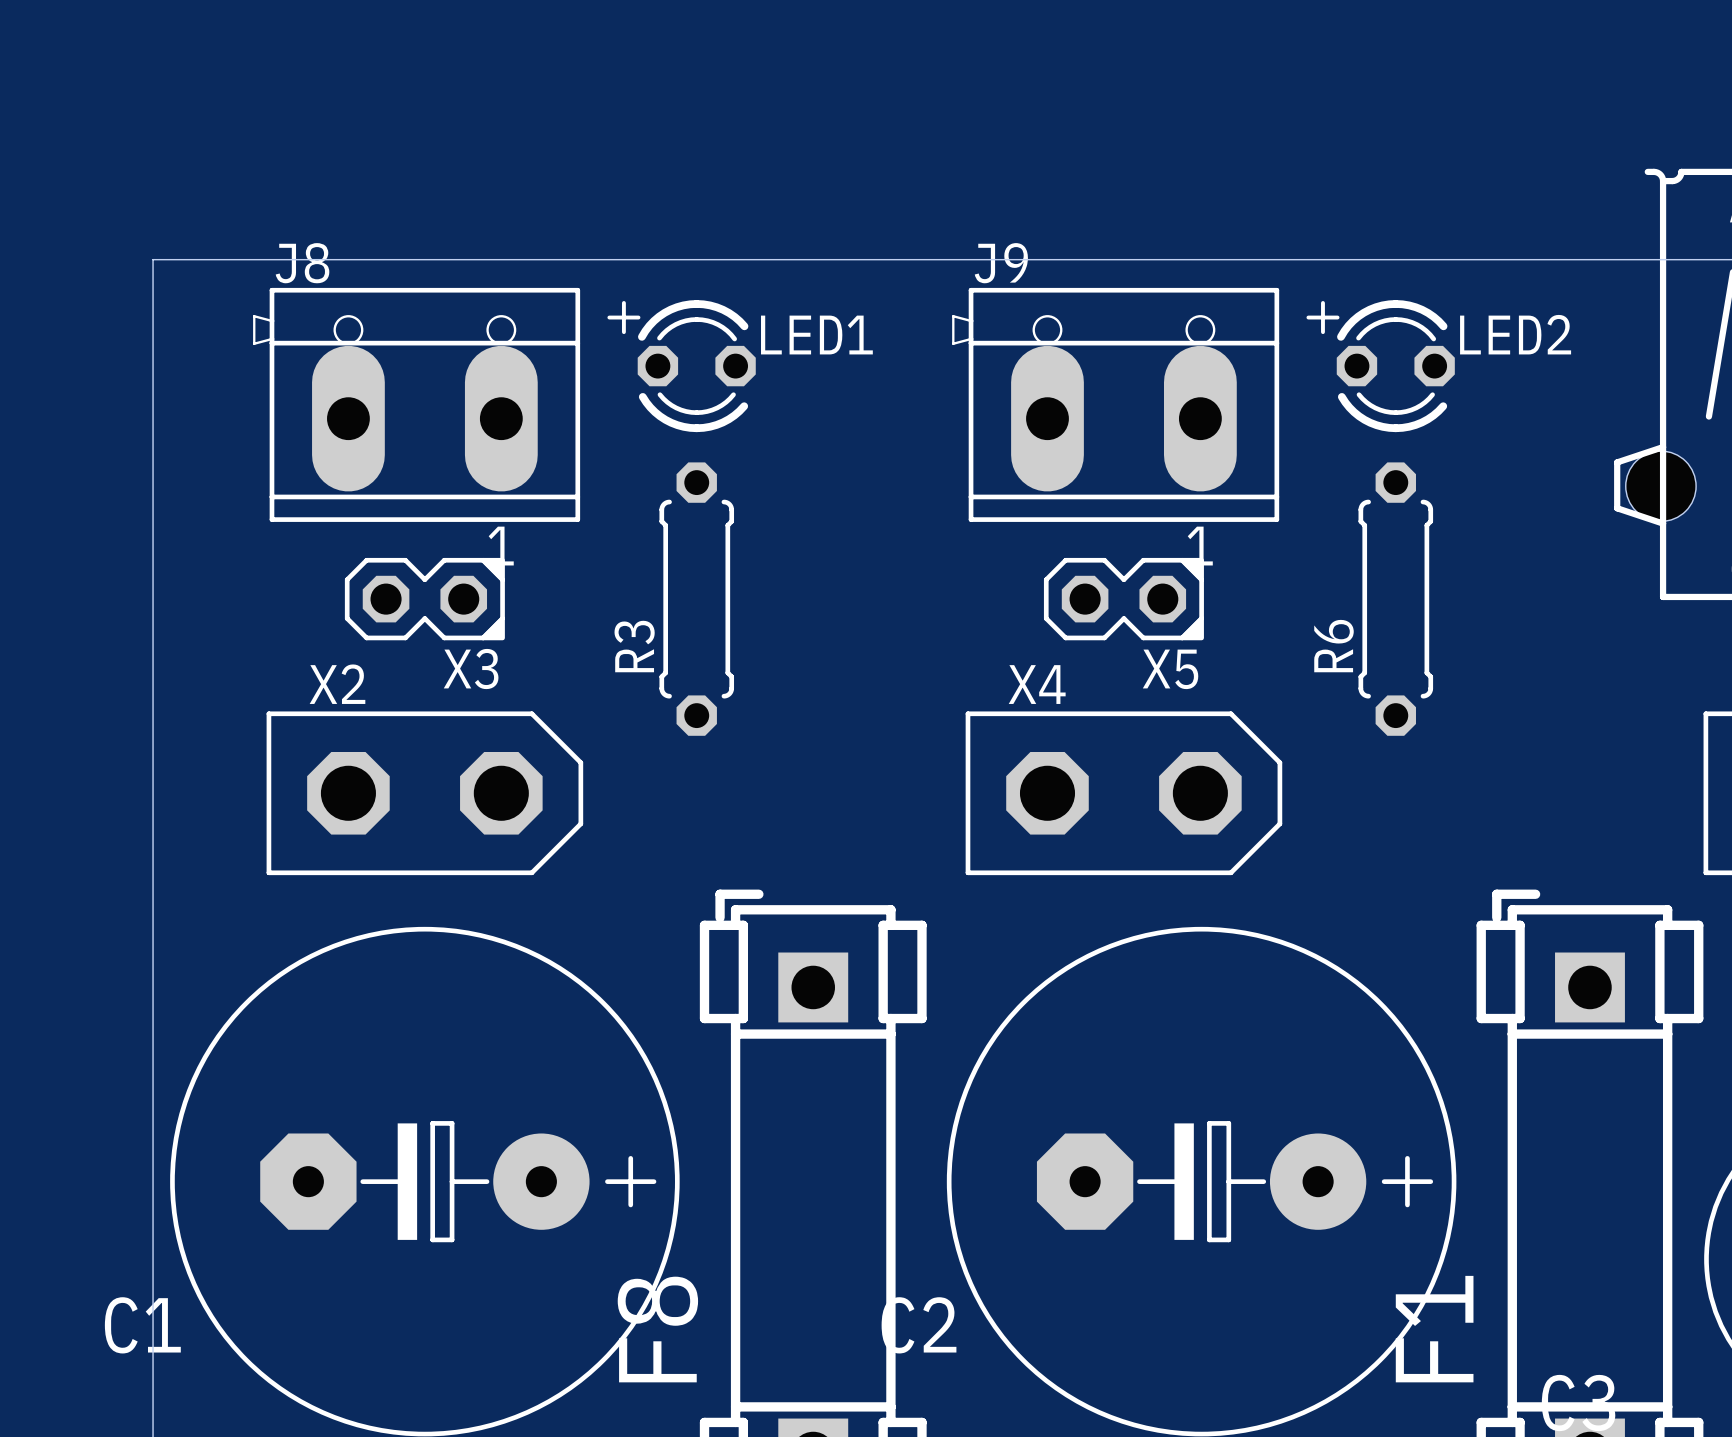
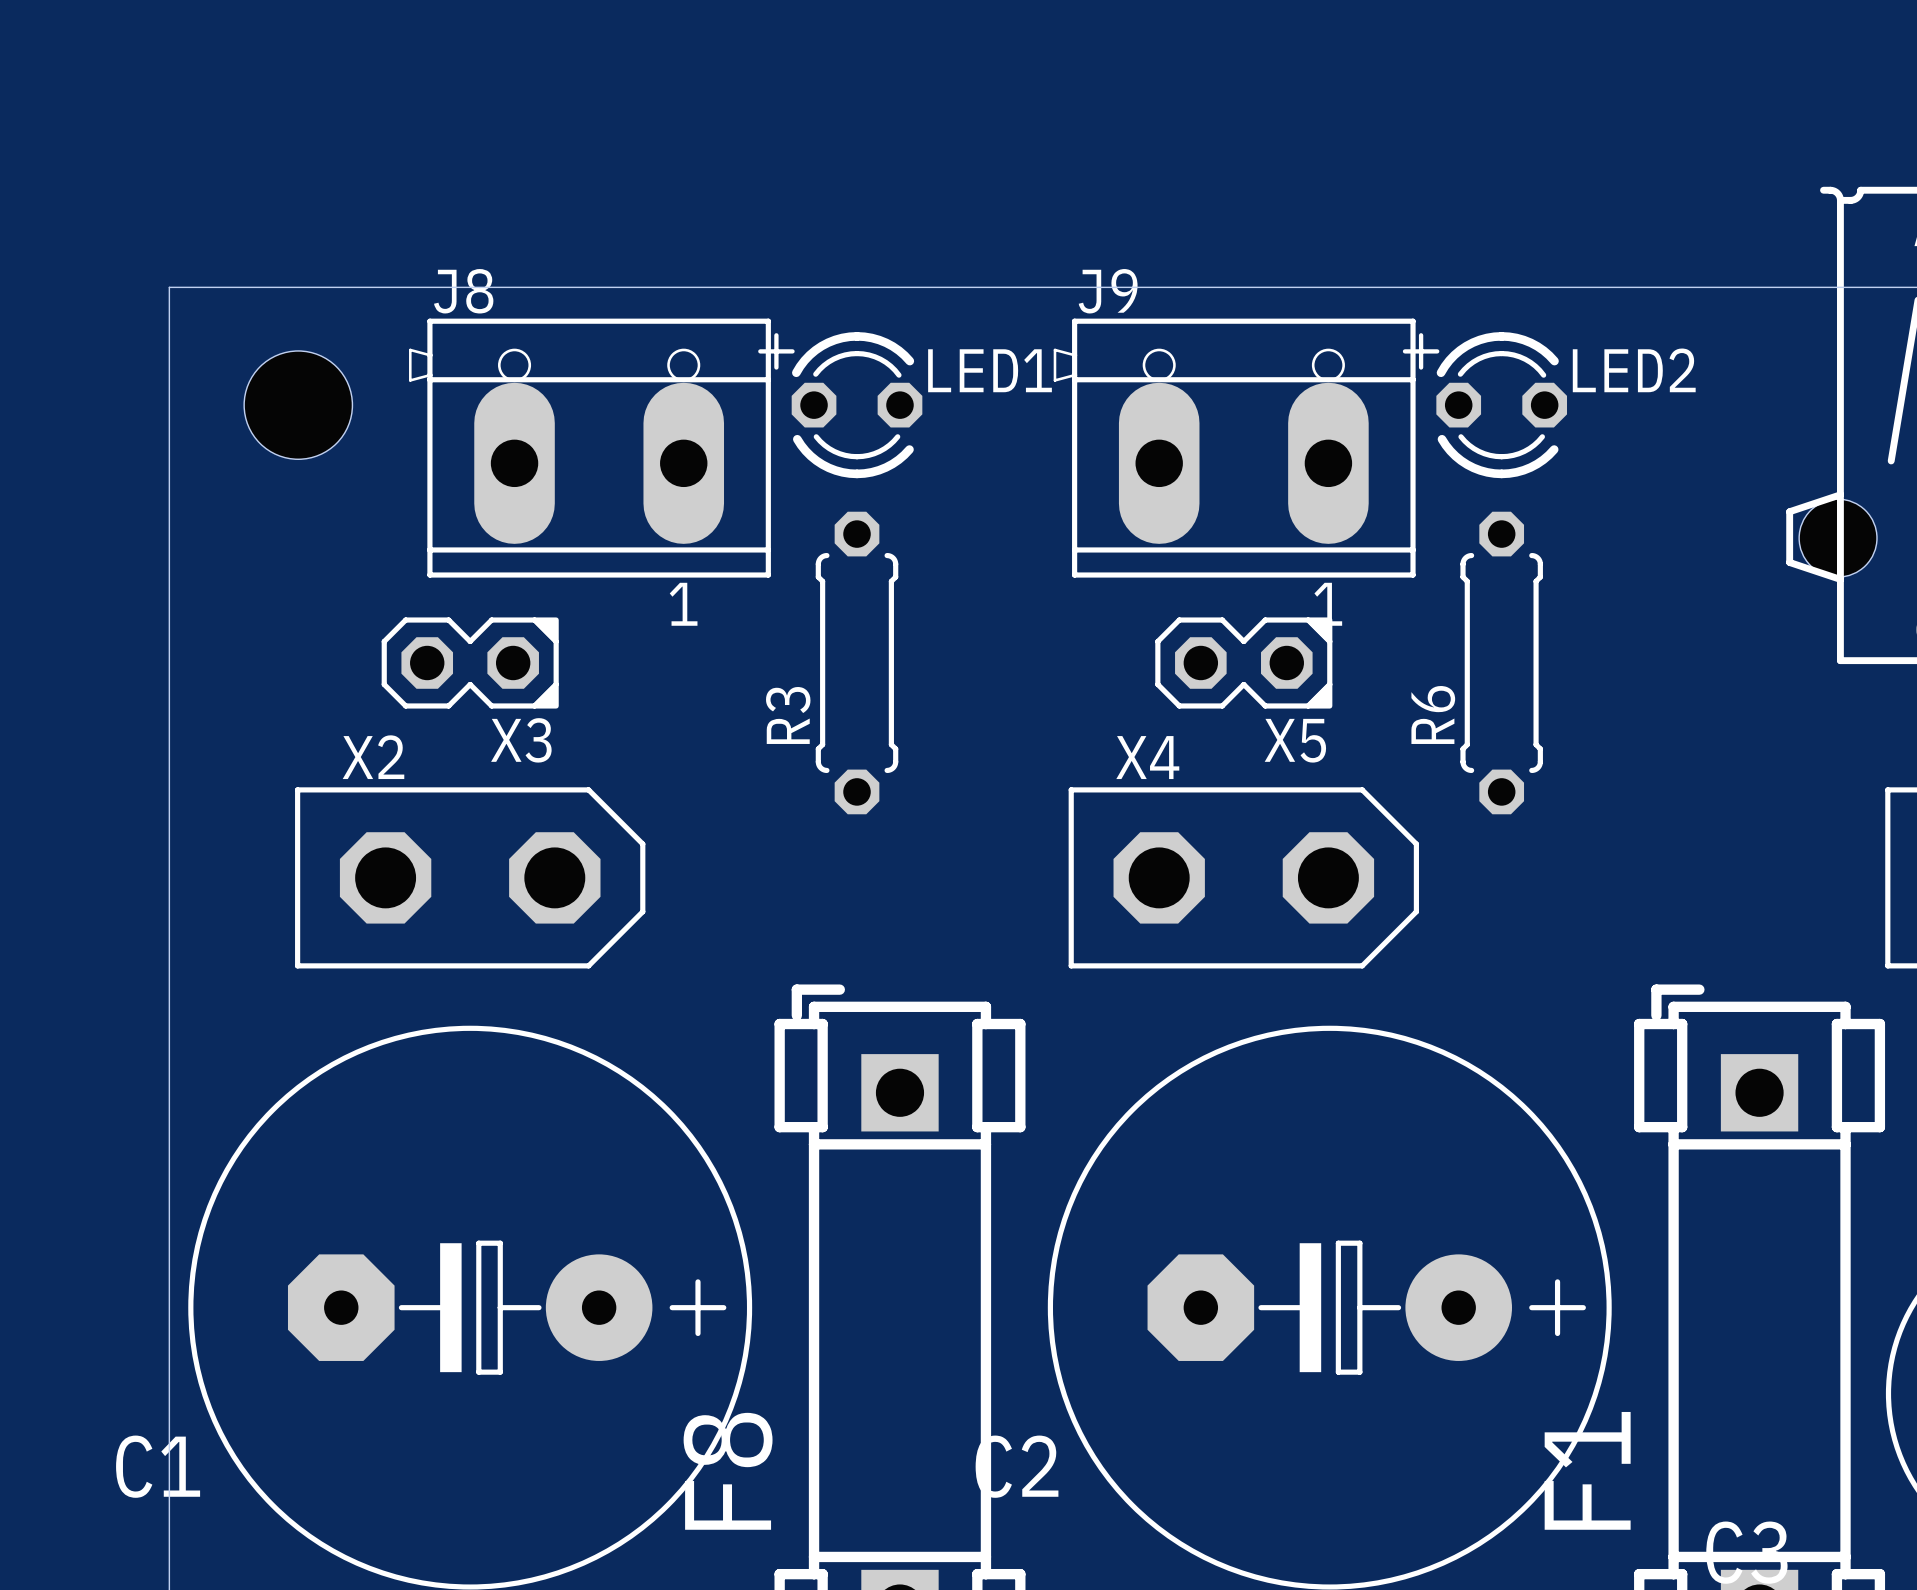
hole: none -> (298, 405)
LED1 position: (681, 366) -> (840, 405)
LED2 position: (1380, 366) -> (1484, 405)
J8 position: (416, 404) -> (589, 448)
R3 position: (696, 599) -> (857, 663)
R6 position: (1395, 599) -> (1501, 663)

